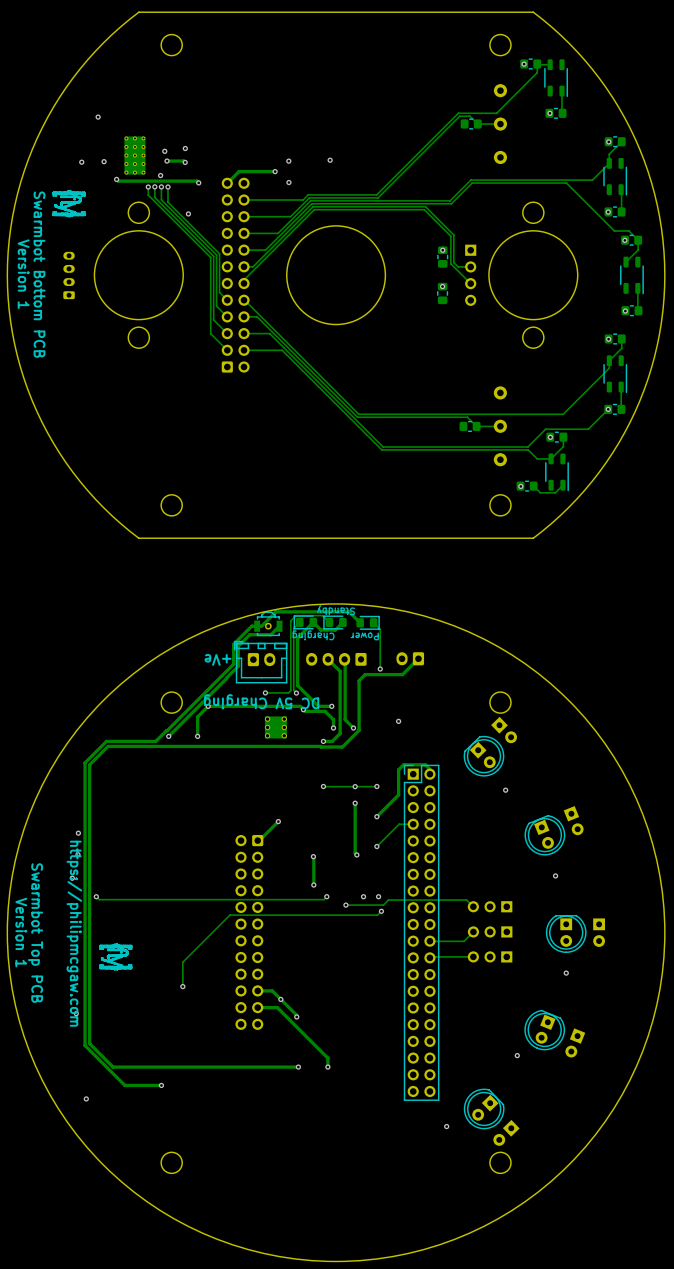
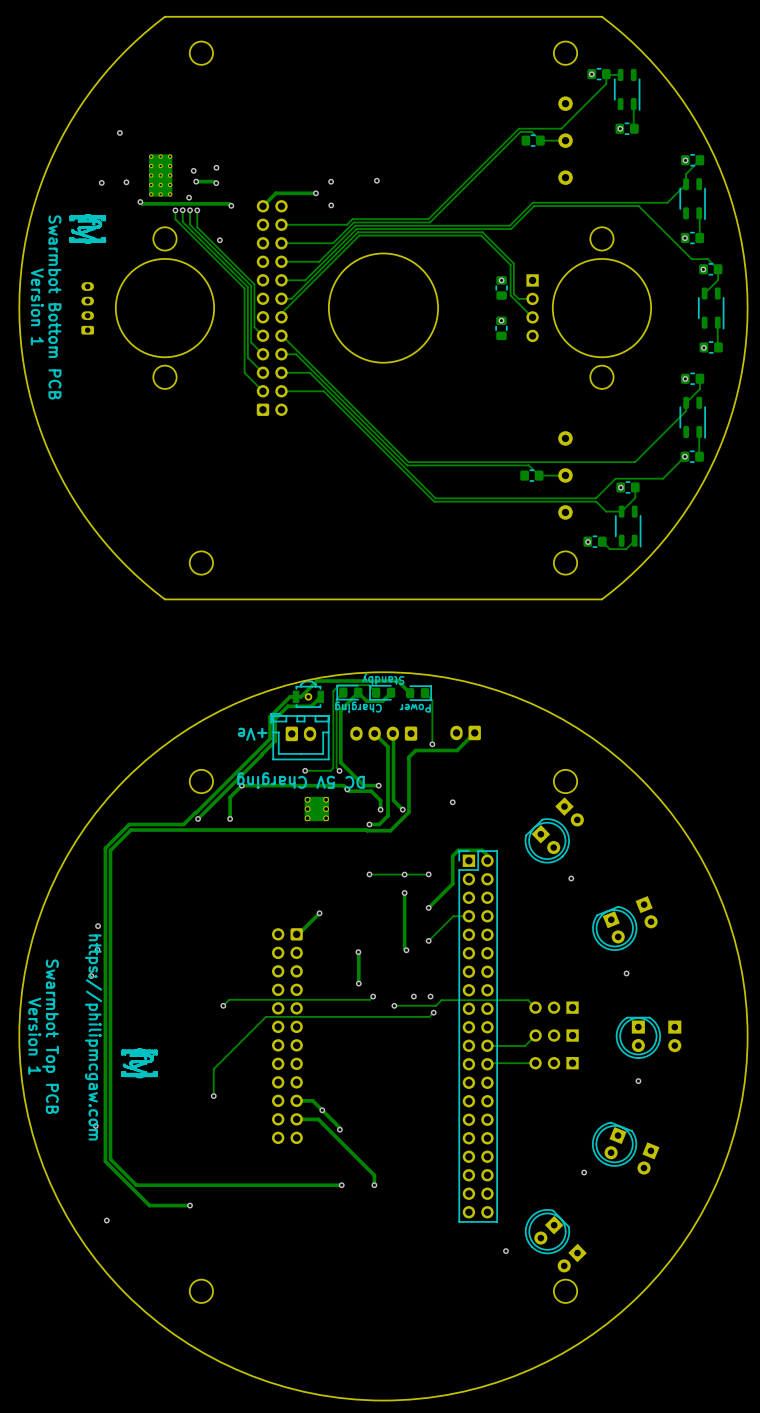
track: (96, 896) (99, 899) (196, 899) -> (223, 1005) (229, 999)
via: (96, 896) -> none
via: none -> (223, 1005)

